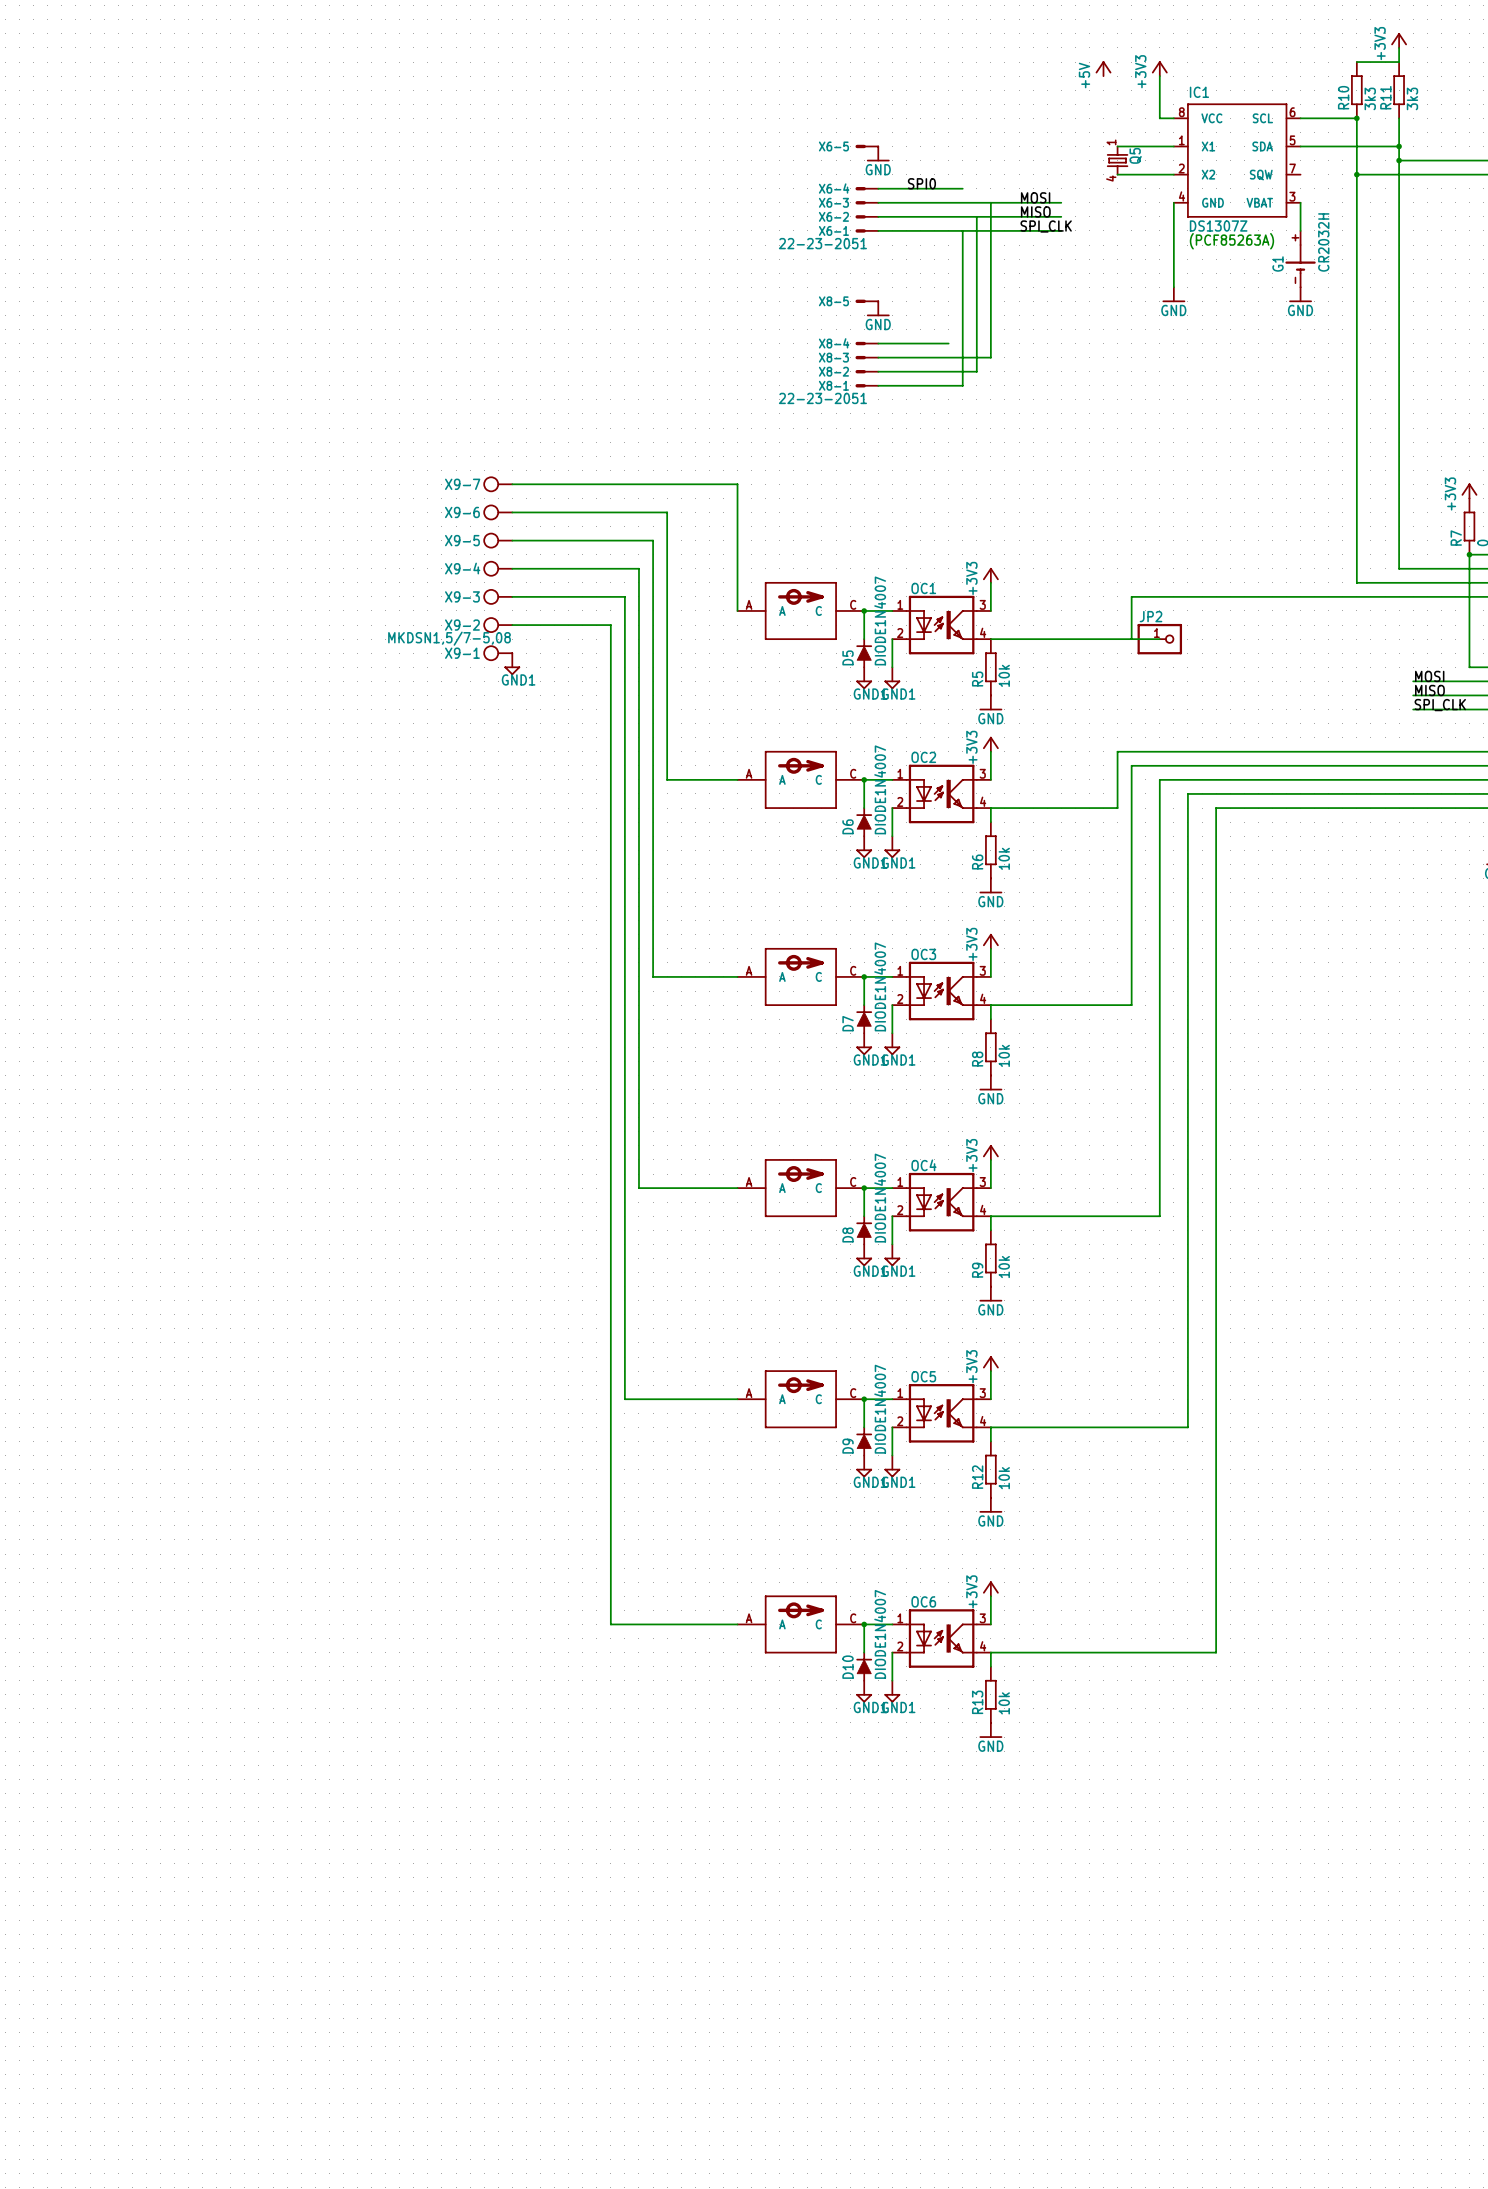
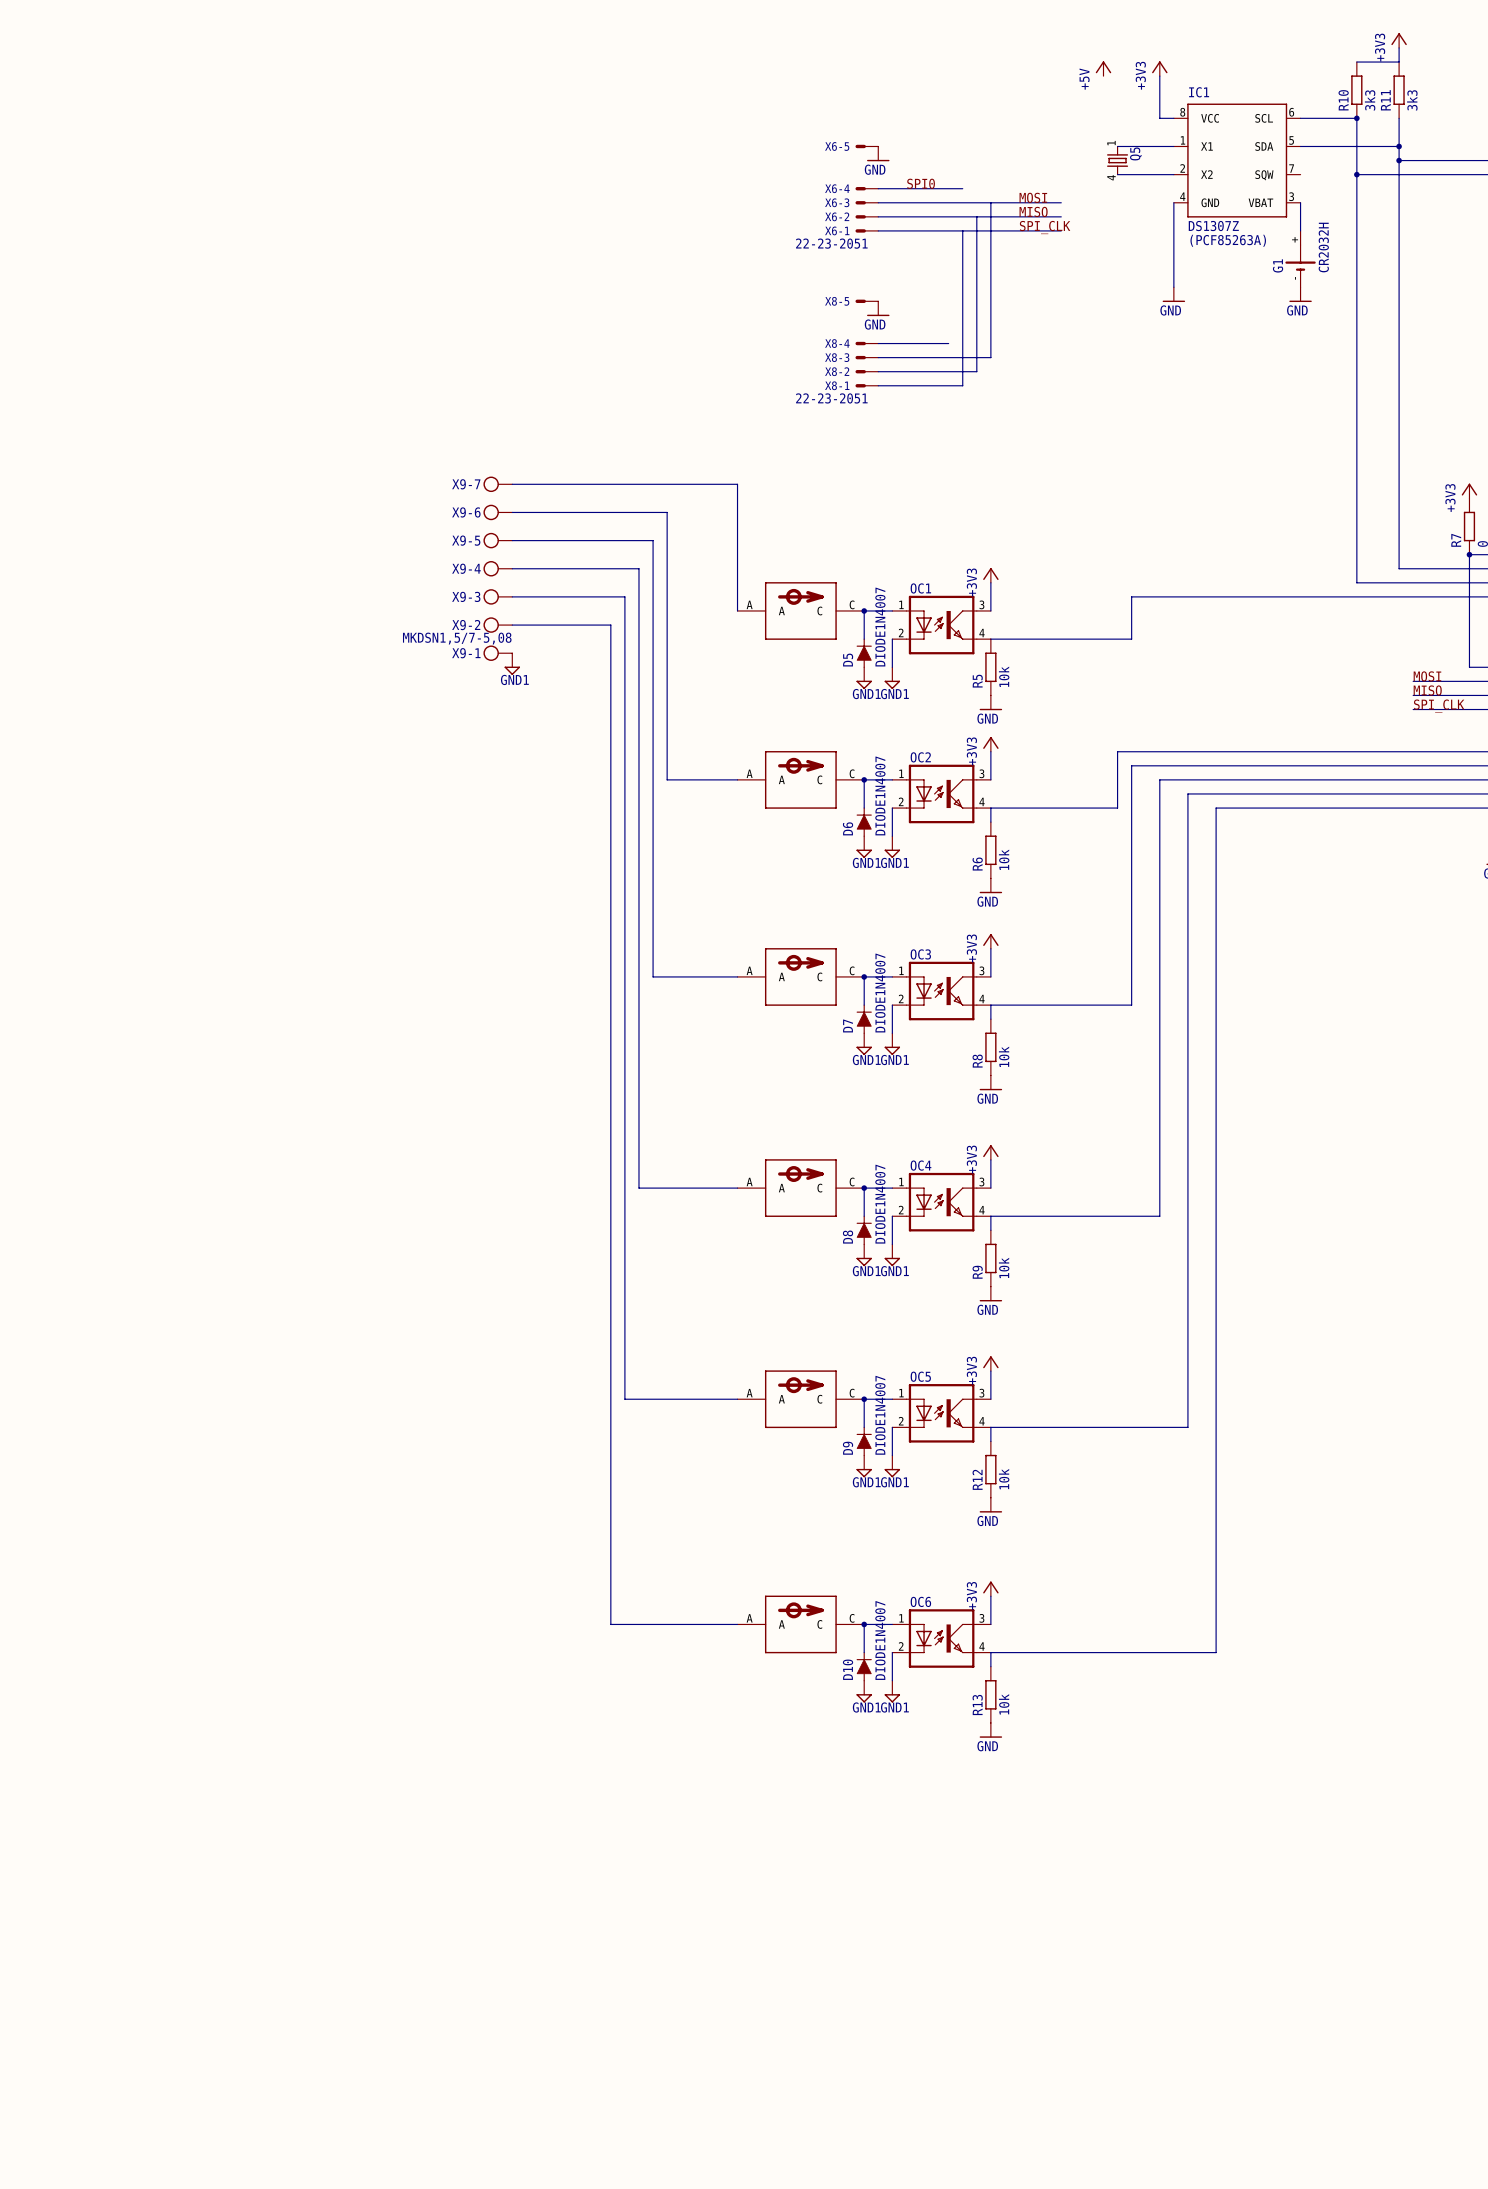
wire: (1131, 639) (1159, 639) -> none
JP2: (1159, 639) -> none

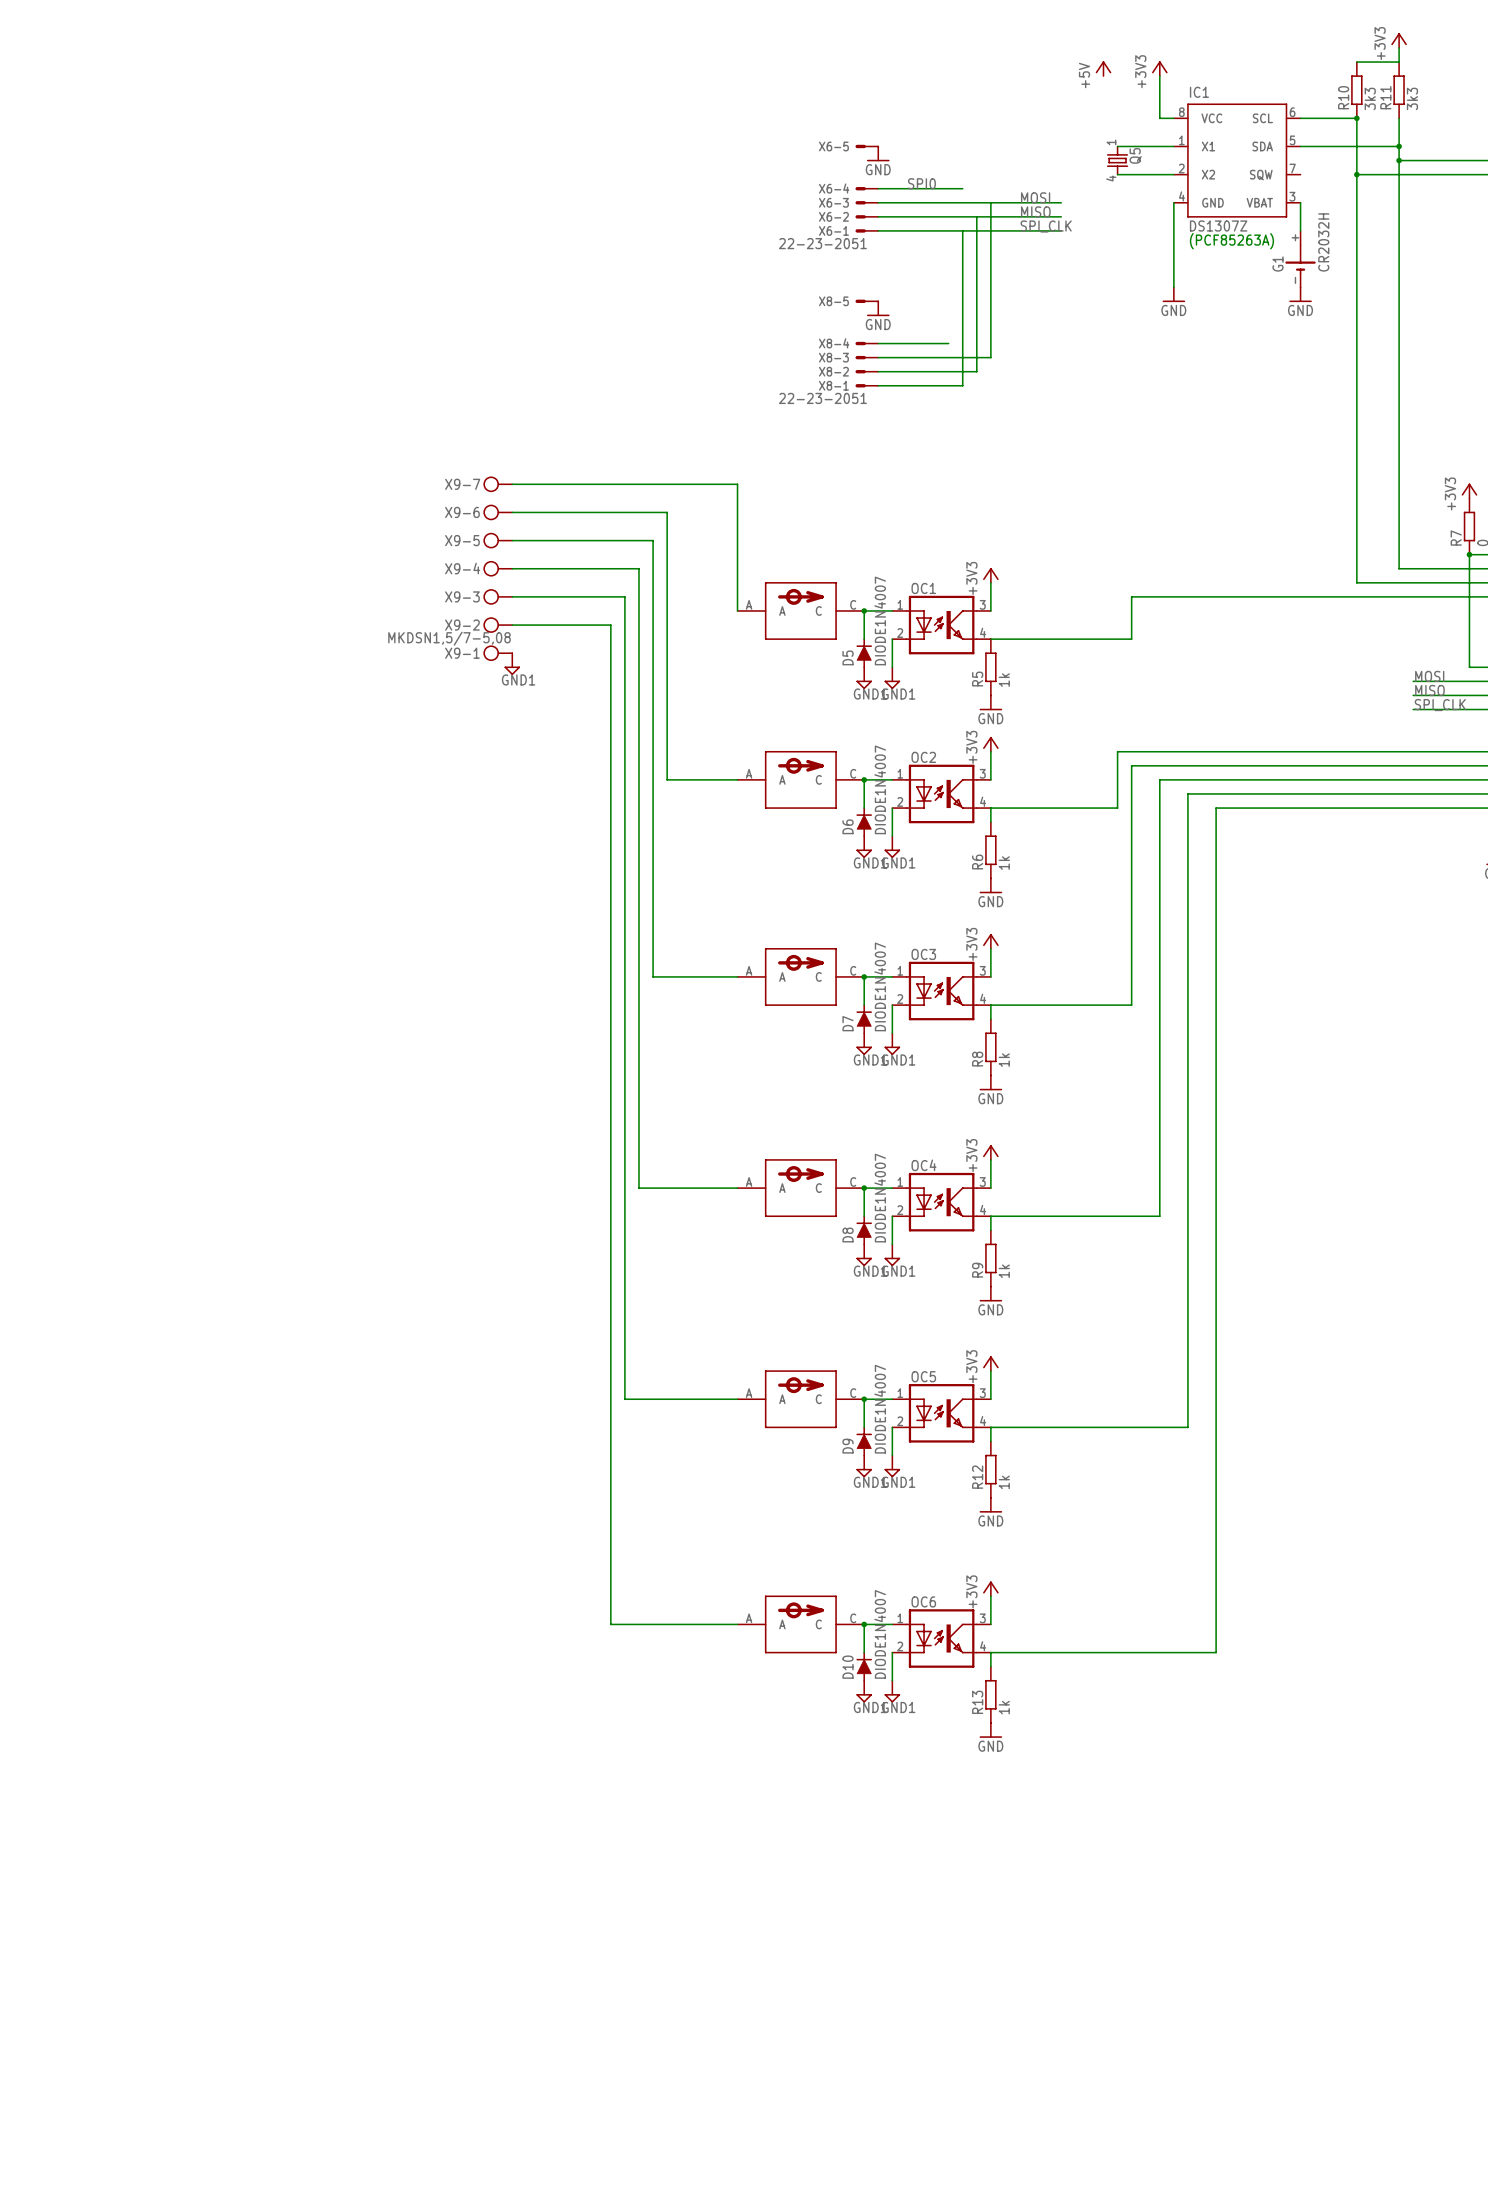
R5 value: 10k (1004, 676) -> 1k (1004, 680)
R6 value: 10k (1004, 859) -> 1k (1004, 863)
R8 value: 10k (1004, 1056) -> 1k (1004, 1060)
R9 value: 10k (1004, 1267) -> 1k (1004, 1271)
R12 value: 10k (1004, 1479) -> 1k (1004, 1482)
R13 value: 10k (1004, 1704) -> 1k (1004, 1707)

